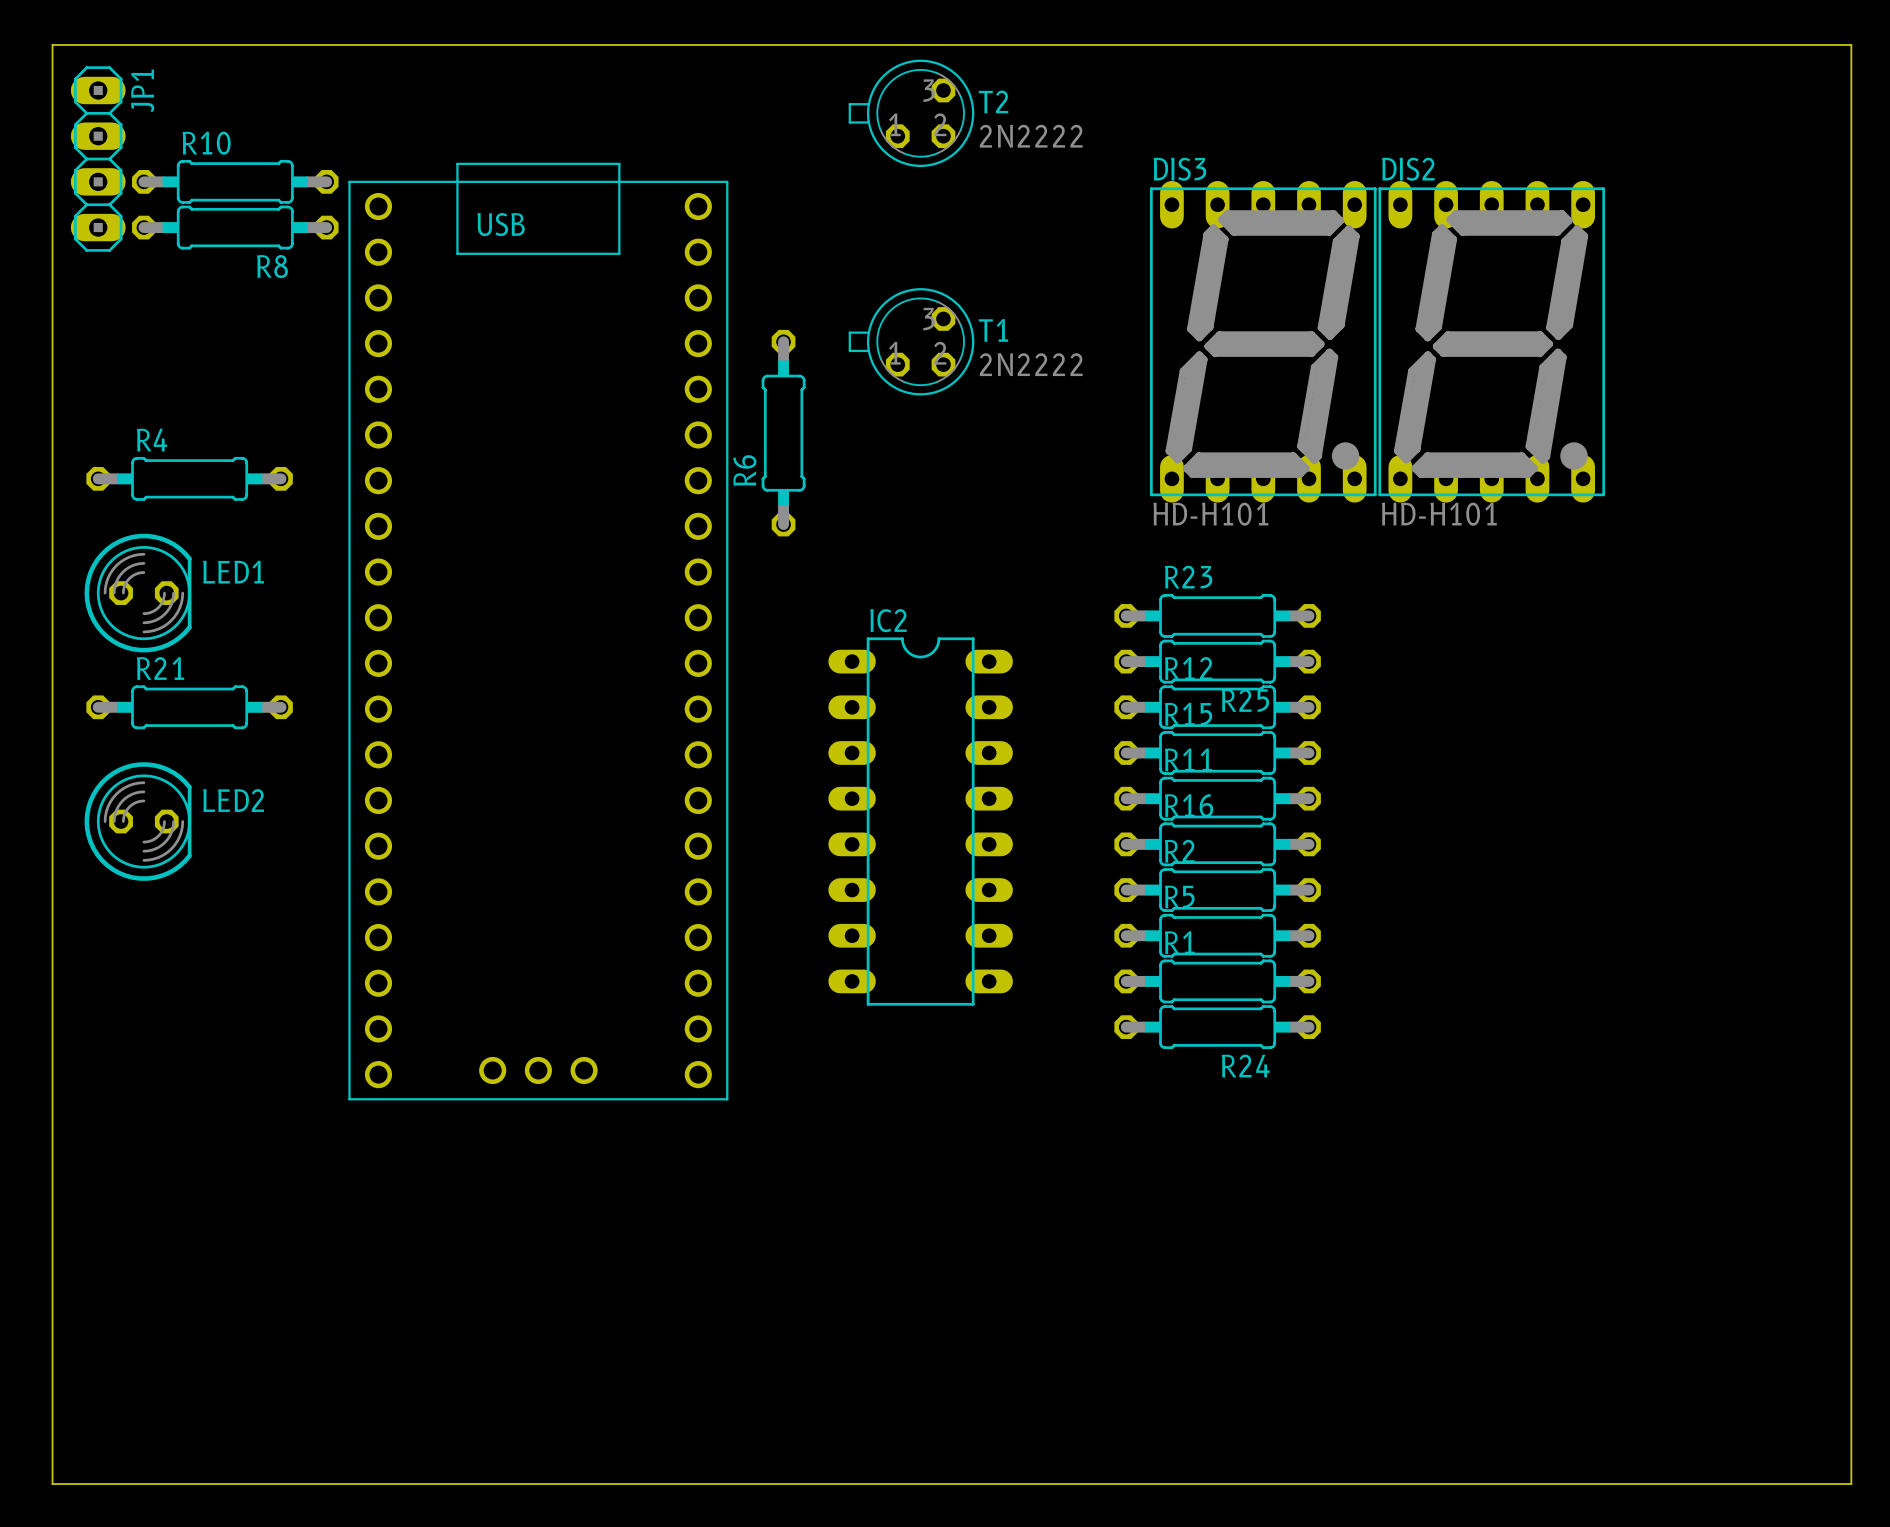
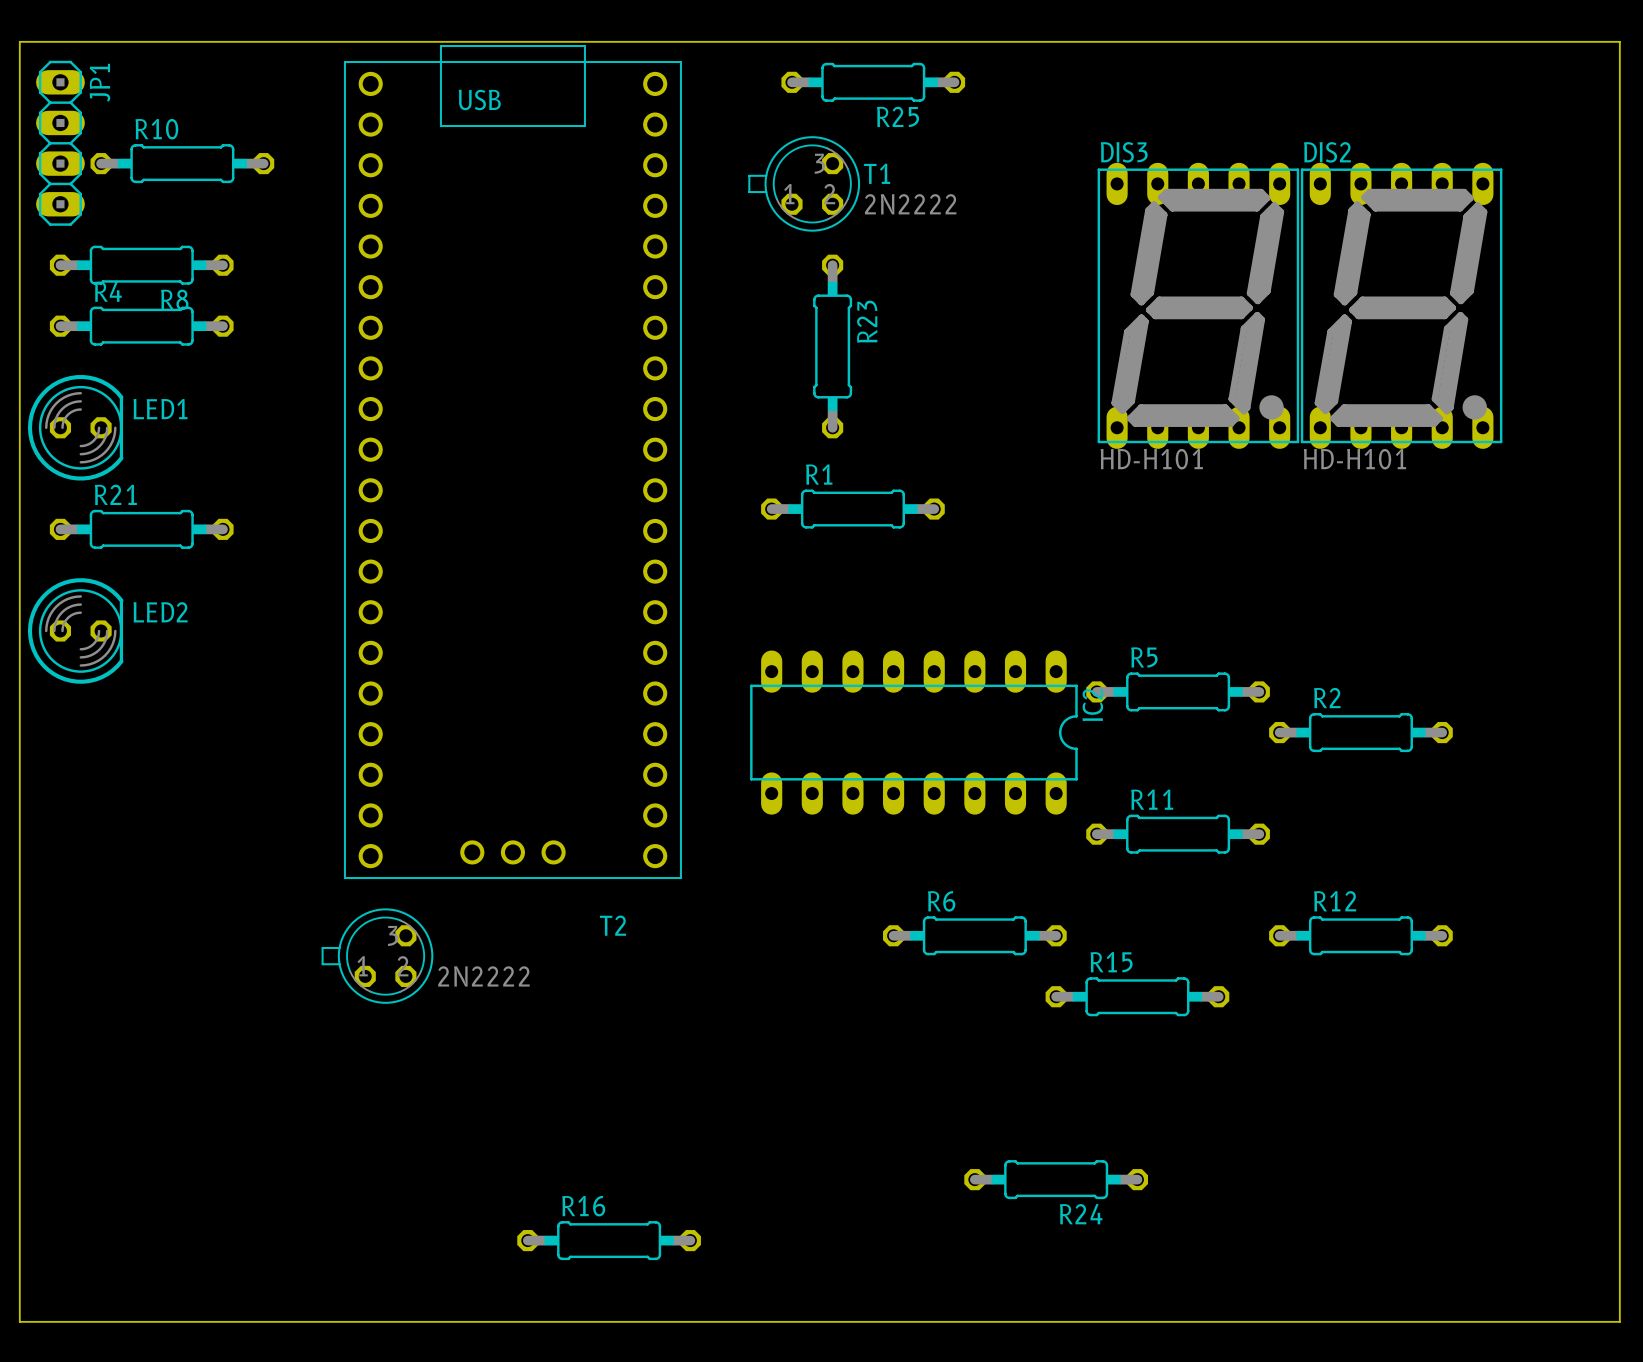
T2 name position: T2 (993, 101) -> T2 (613, 925)
T2 position: (911, 113) -> (377, 956)
R8 position: (235, 227) -> (141, 265)
T1 position: (911, 341) -> (804, 183)
DIS3 position: (1263, 341) -> (1198, 305)
DIS2 position: (1491, 341) -> (1401, 305)
R6 rotation: 0° (783, 433) -> 90° clockwise (974, 935)
R6 position: (783, 433) -> (974, 935)
R4 position: (189, 478) -> (141, 326)
LED1 position: (138, 593) -> (75, 427)
R23 rotation: 0° (1217, 615) -> 90° clockwise (832, 346)
R23 position: (1217, 615) -> (832, 346)
part position: (538, 631) -> (512, 462)
R25 position: (1217, 661) -> (873, 82)
R21 position: (189, 707) -> (141, 529)
R12 position: (1217, 707) -> (1360, 935)
R15 position: (1217, 752) -> (1137, 996)
R11 position: (1217, 798) -> (1178, 834)
LED2 position: (138, 821) -> (75, 630)
IC2 rotation: 0° (920, 821) -> 90° clockwise (913, 732)
R16 position: (1217, 844) -> (609, 1240)
R2 position: (1217, 890) -> (1360, 732)
R5 position: (1217, 935) -> (1178, 691)
R1 position: (1217, 981) -> (852, 509)
R24 position: (1217, 1027) -> (1056, 1179)

